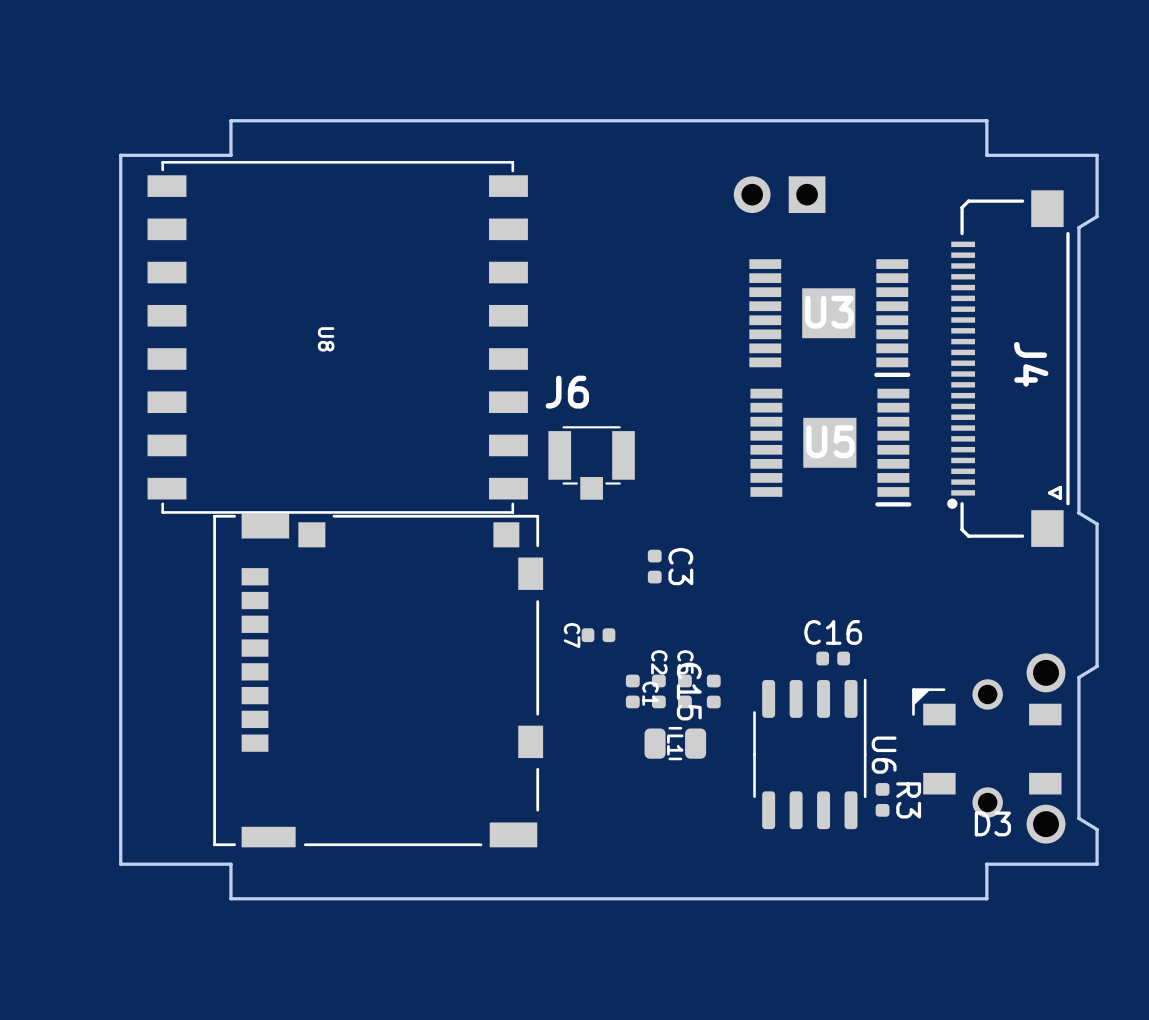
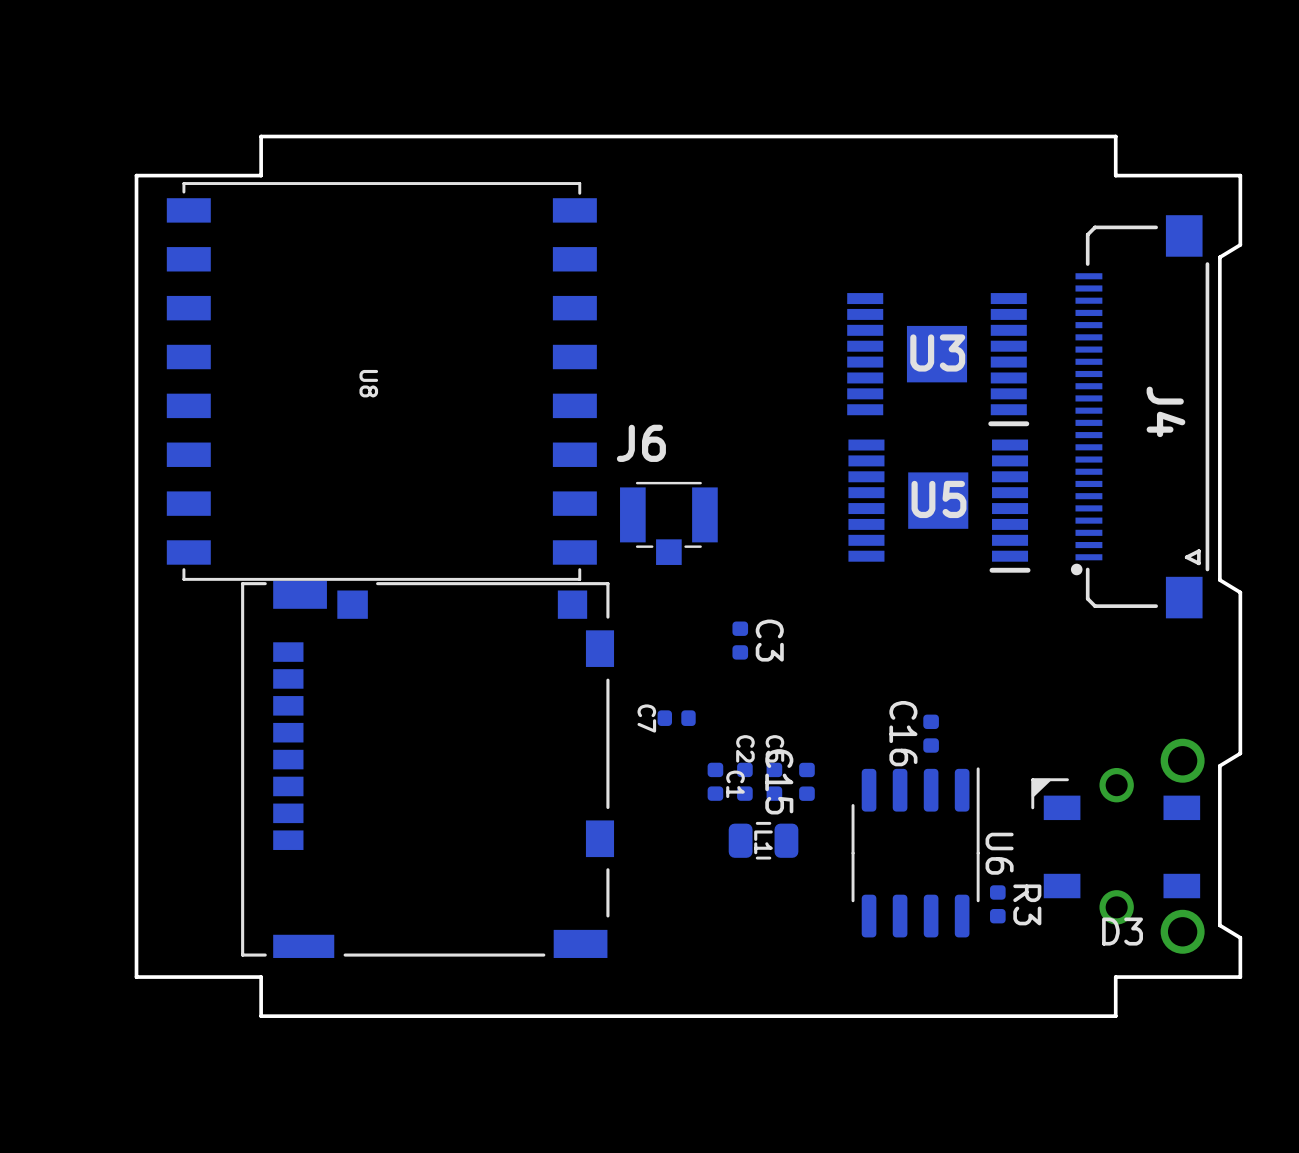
part: (779, 194) -> none
C16 rotation: 0° (833, 658) -> 90° clockwise (931, 733)

